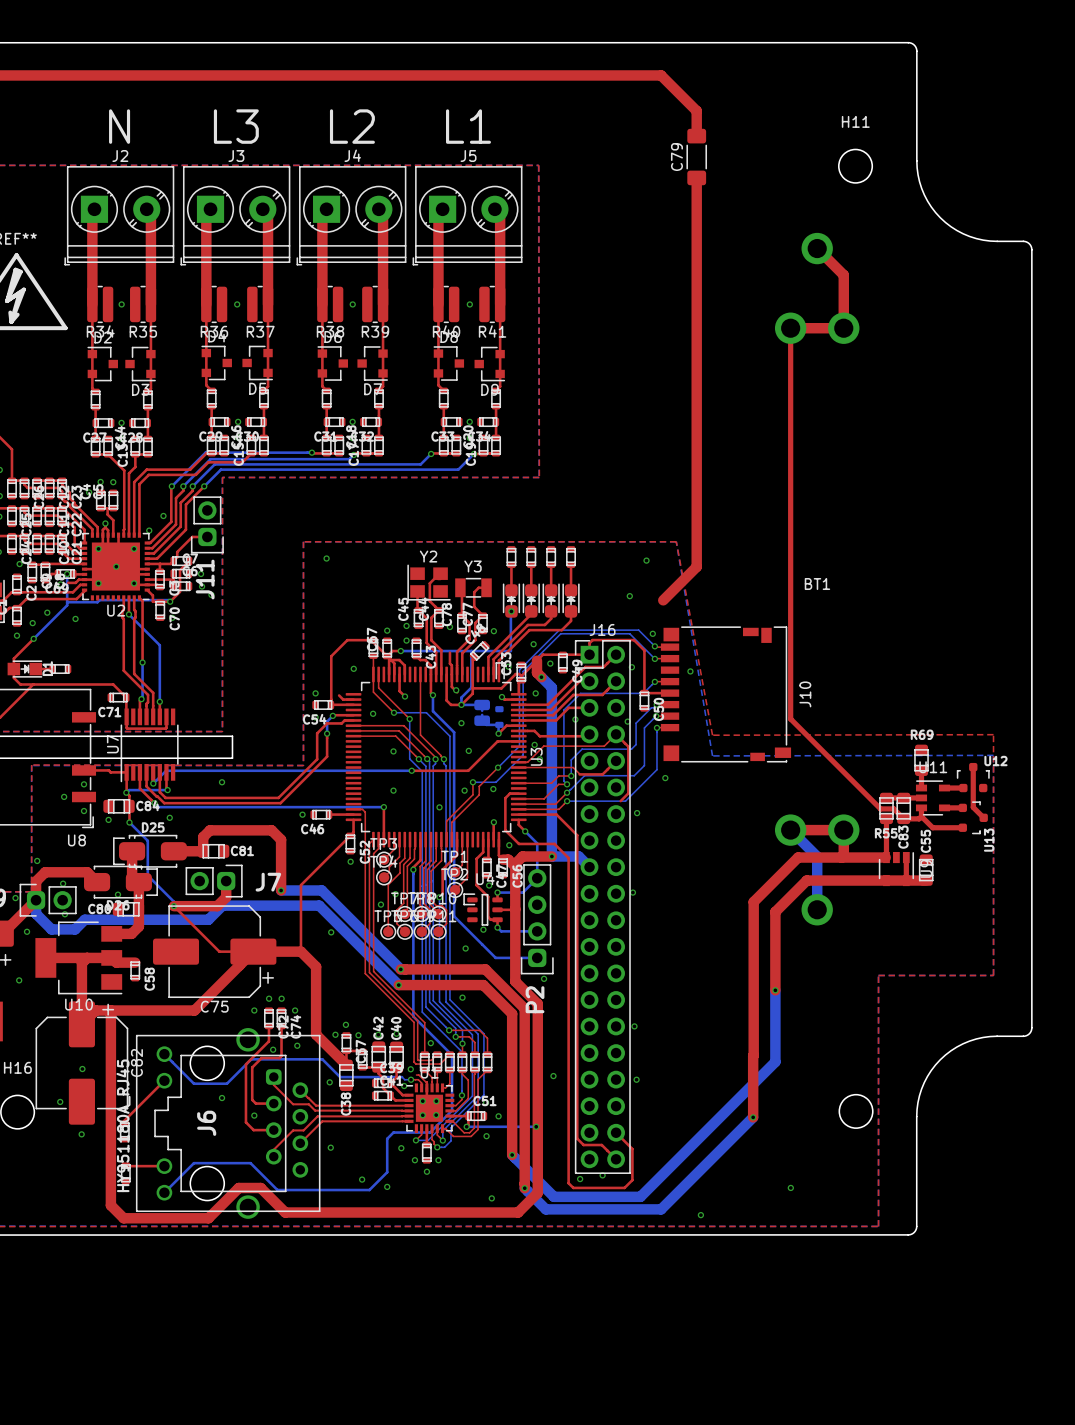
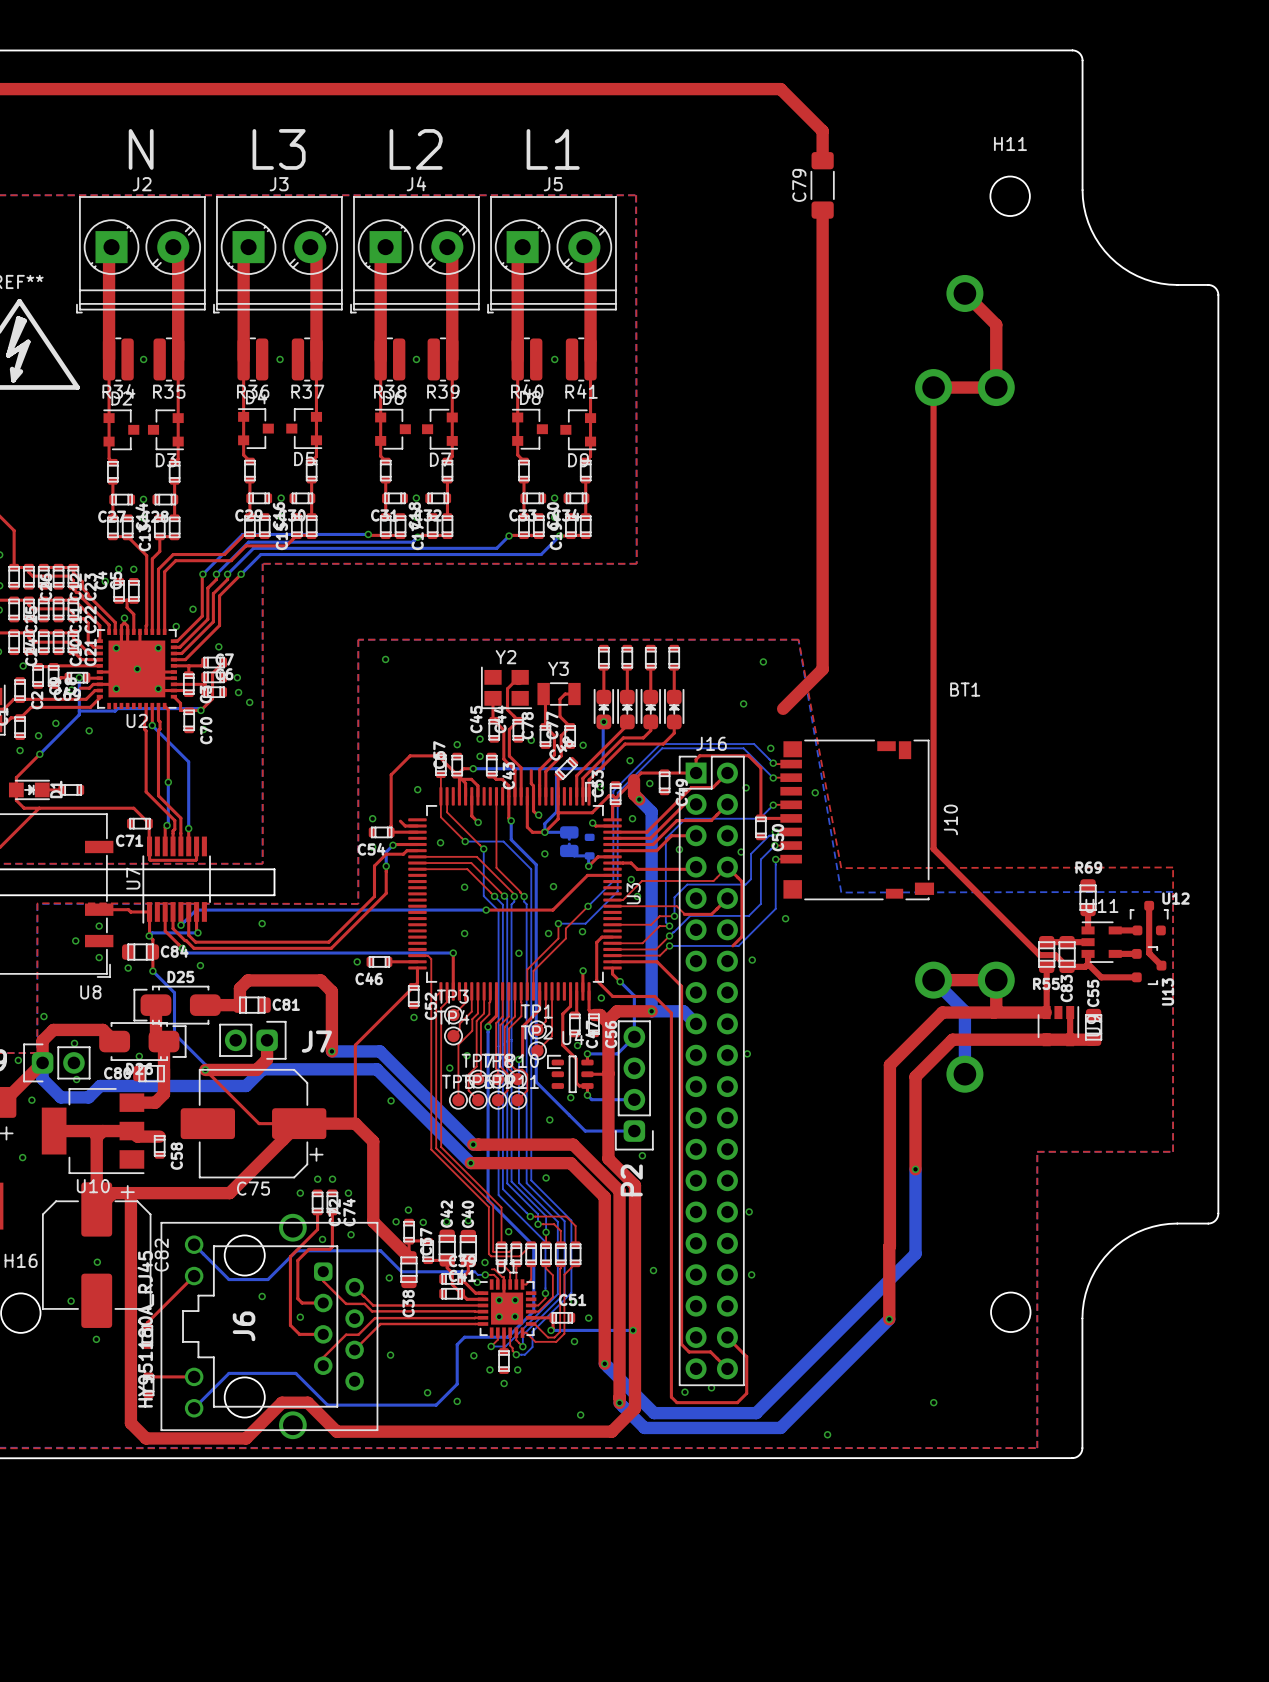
J11: (207, 524) -> none
top track: (207, 536) (192, 536) (177, 552) (177, 557) (173, 561) -> none
via: none -> (218, 646)

